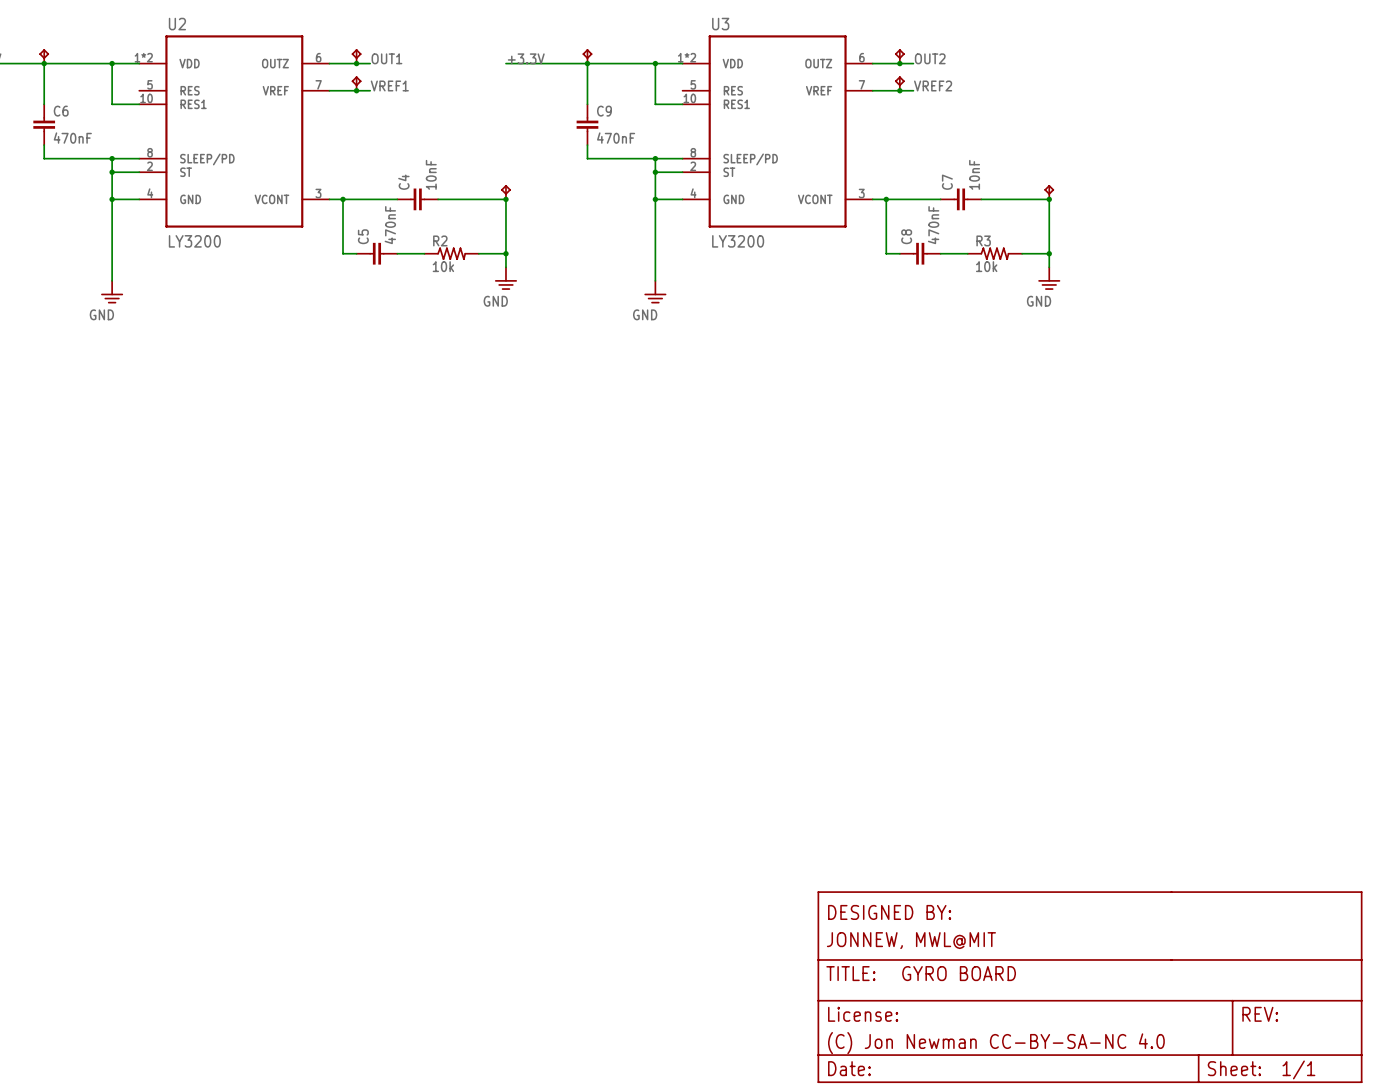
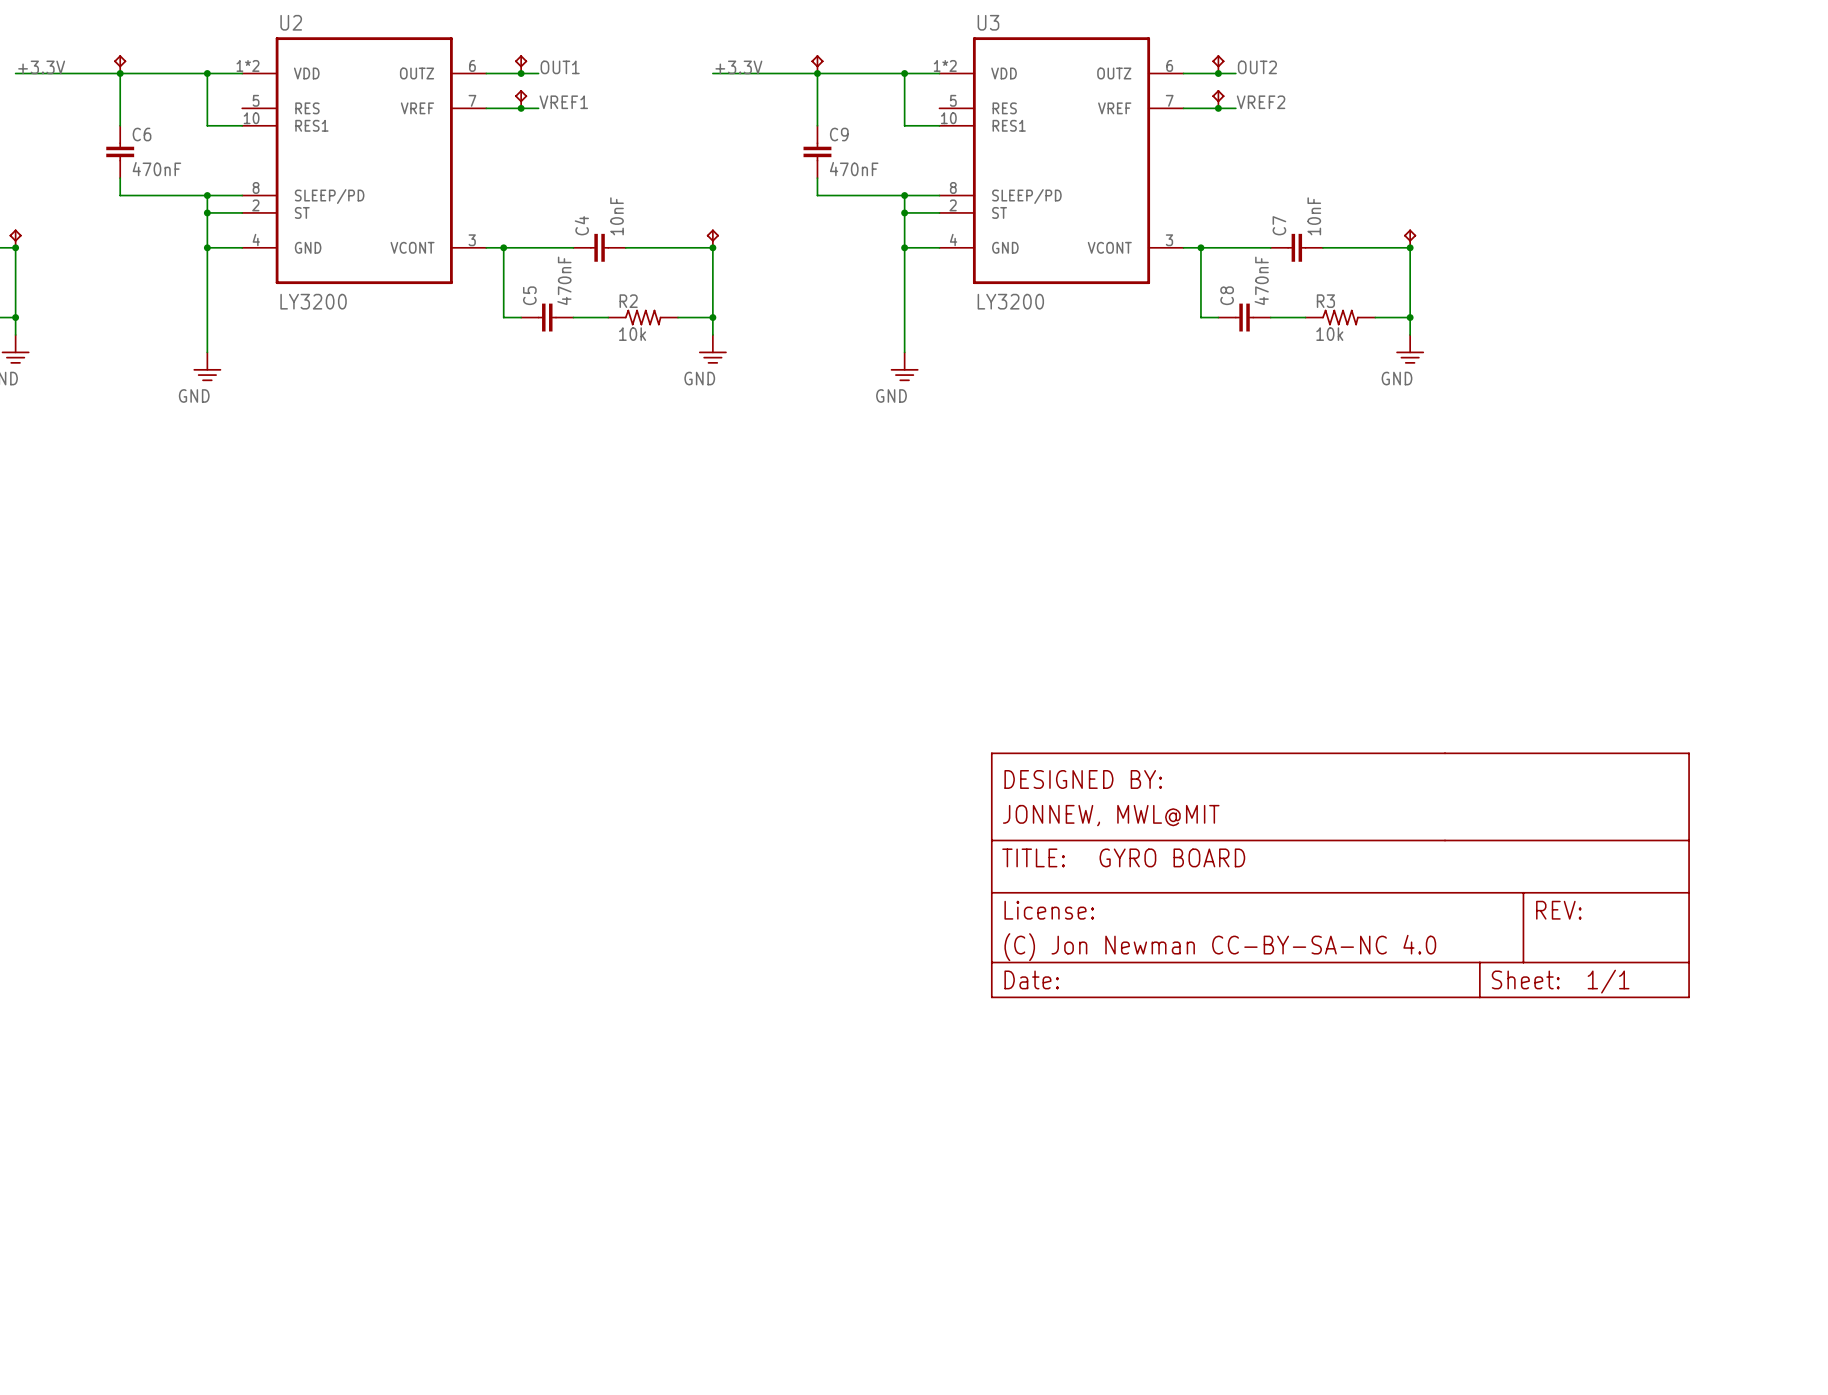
part: none -> (1340, 875)
part: (1090, 987) -> none

